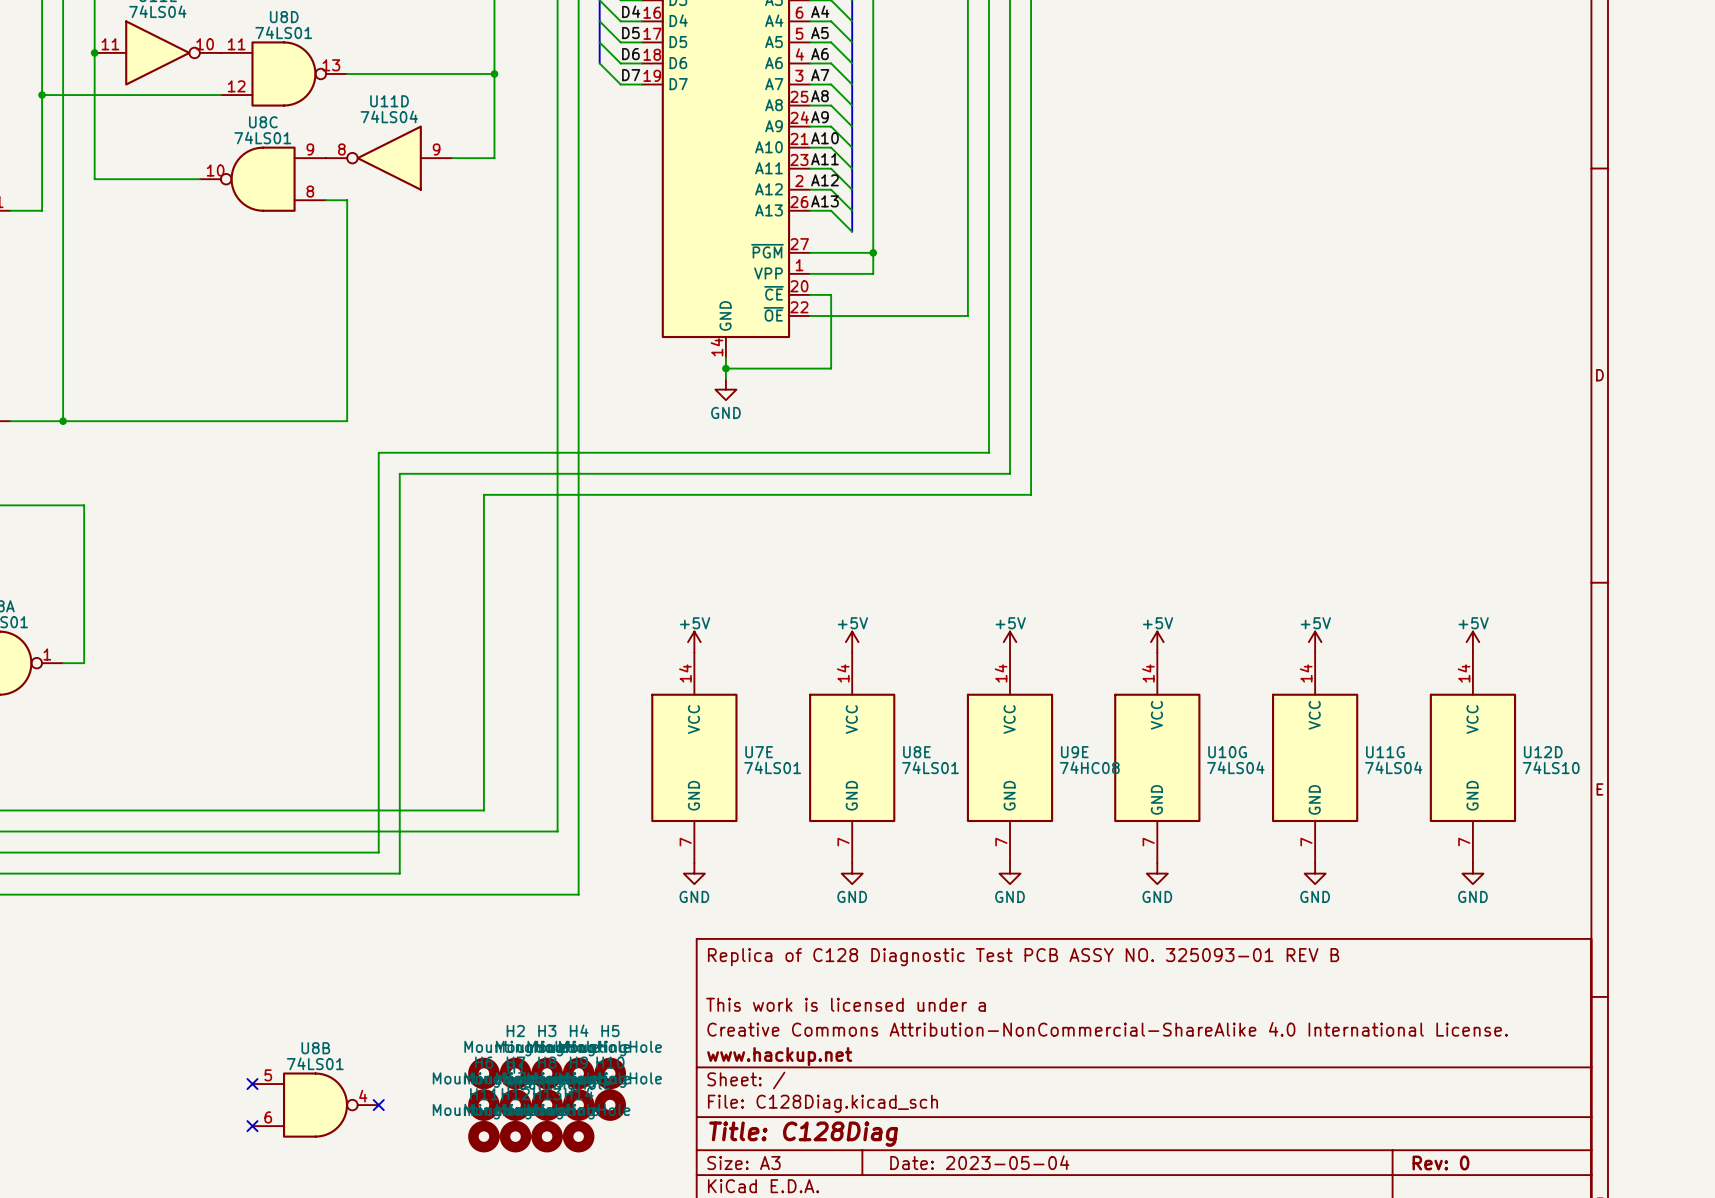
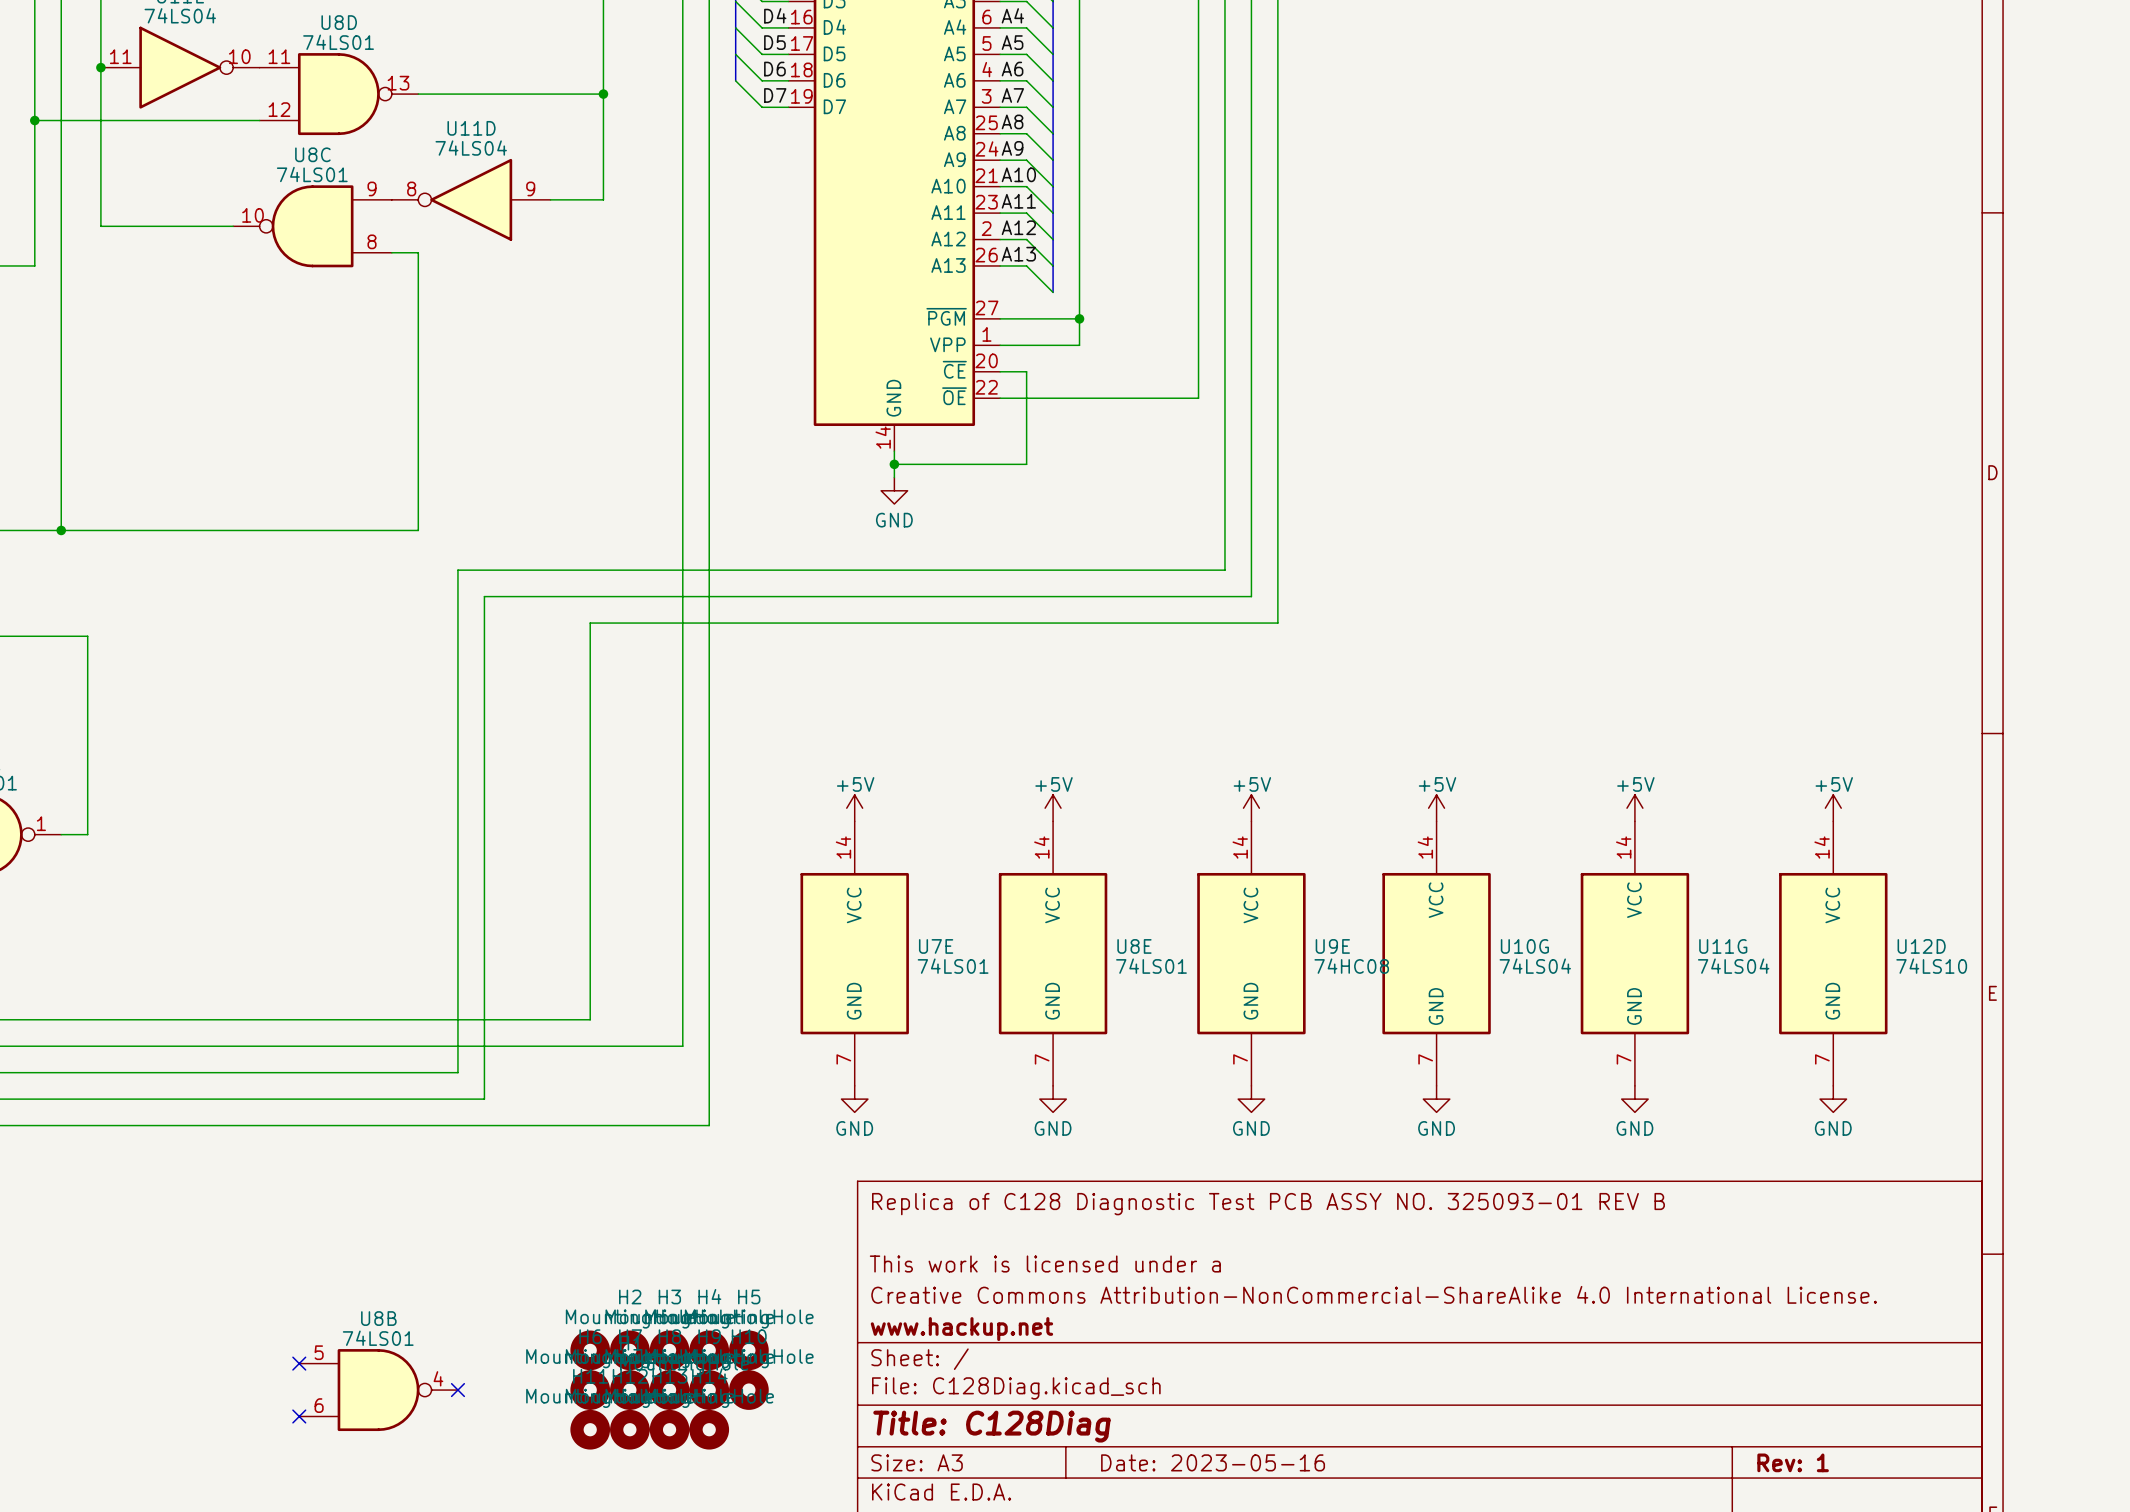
title block: Date: 2023-05-04 (979, 1162) -> Date: 2023-05-16 (1213, 1462)
title block: Rev: 0 (1440, 1163) -> Rev: 1 (1793, 1462)

